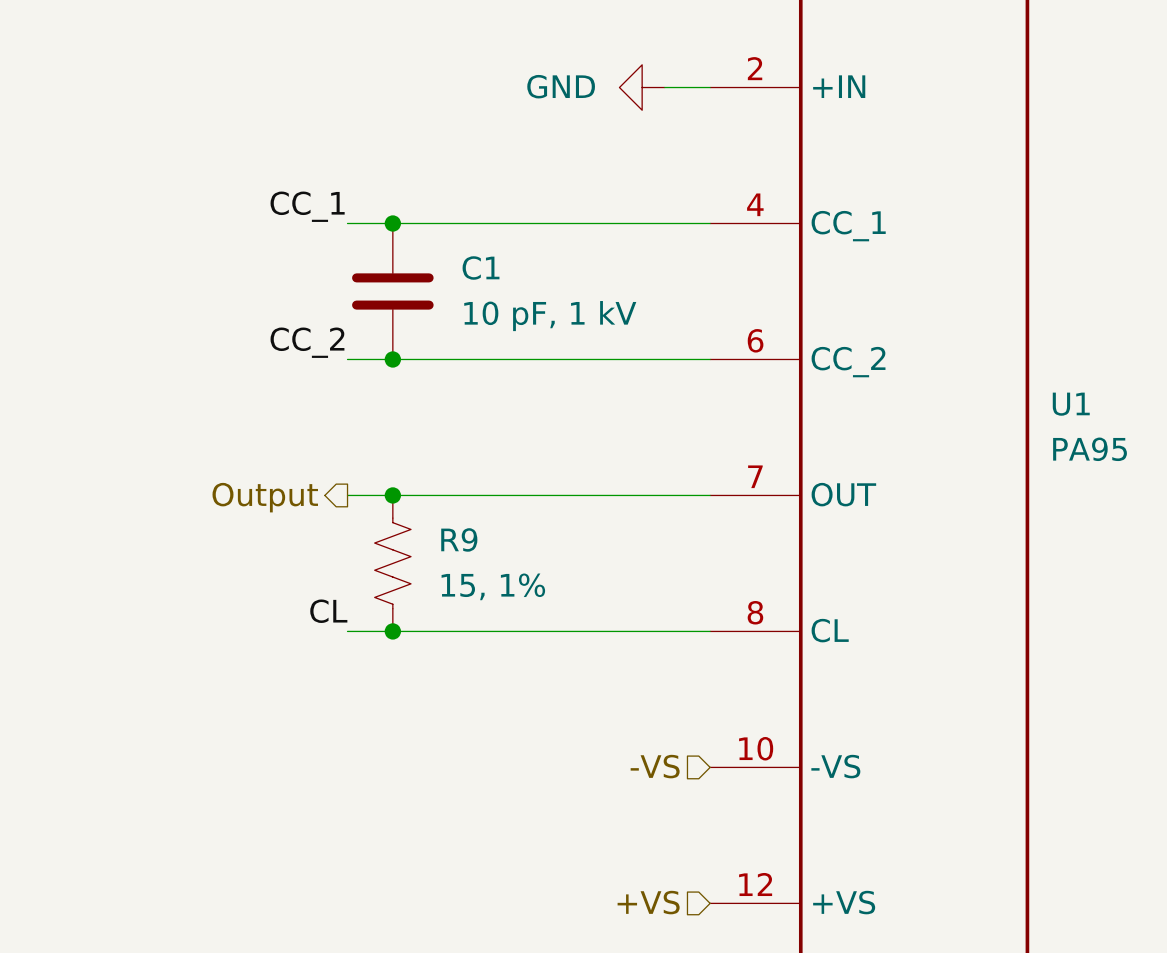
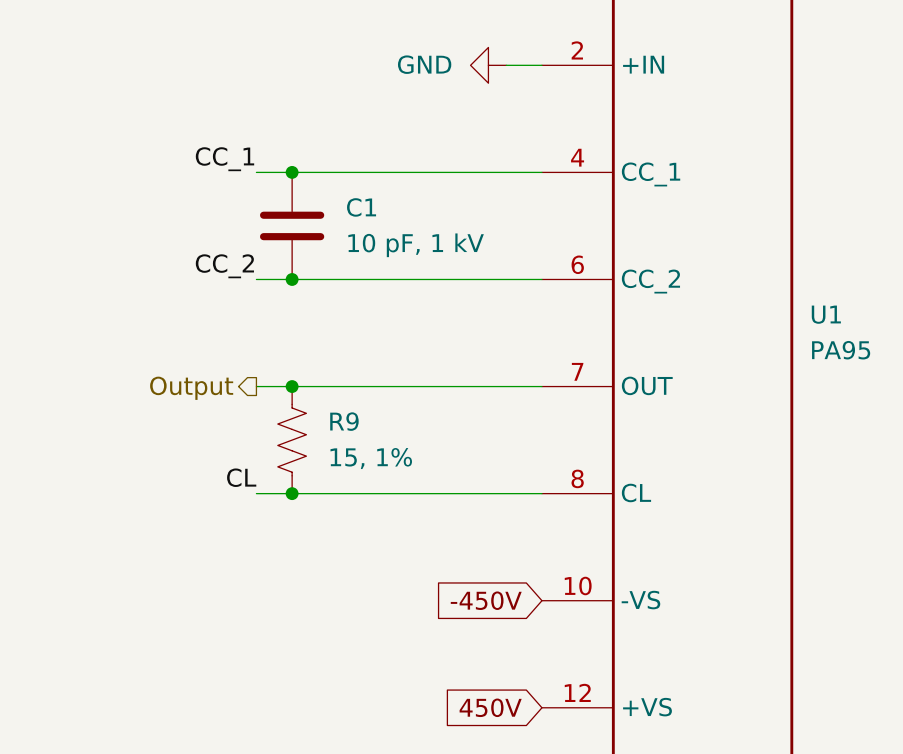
hierarchical label: -VS (655, 766) -> none
global label: none -> -450V (486, 600)
hierarchical label: +VS (648, 902) -> none
global label: none -> 450V (490, 707)

